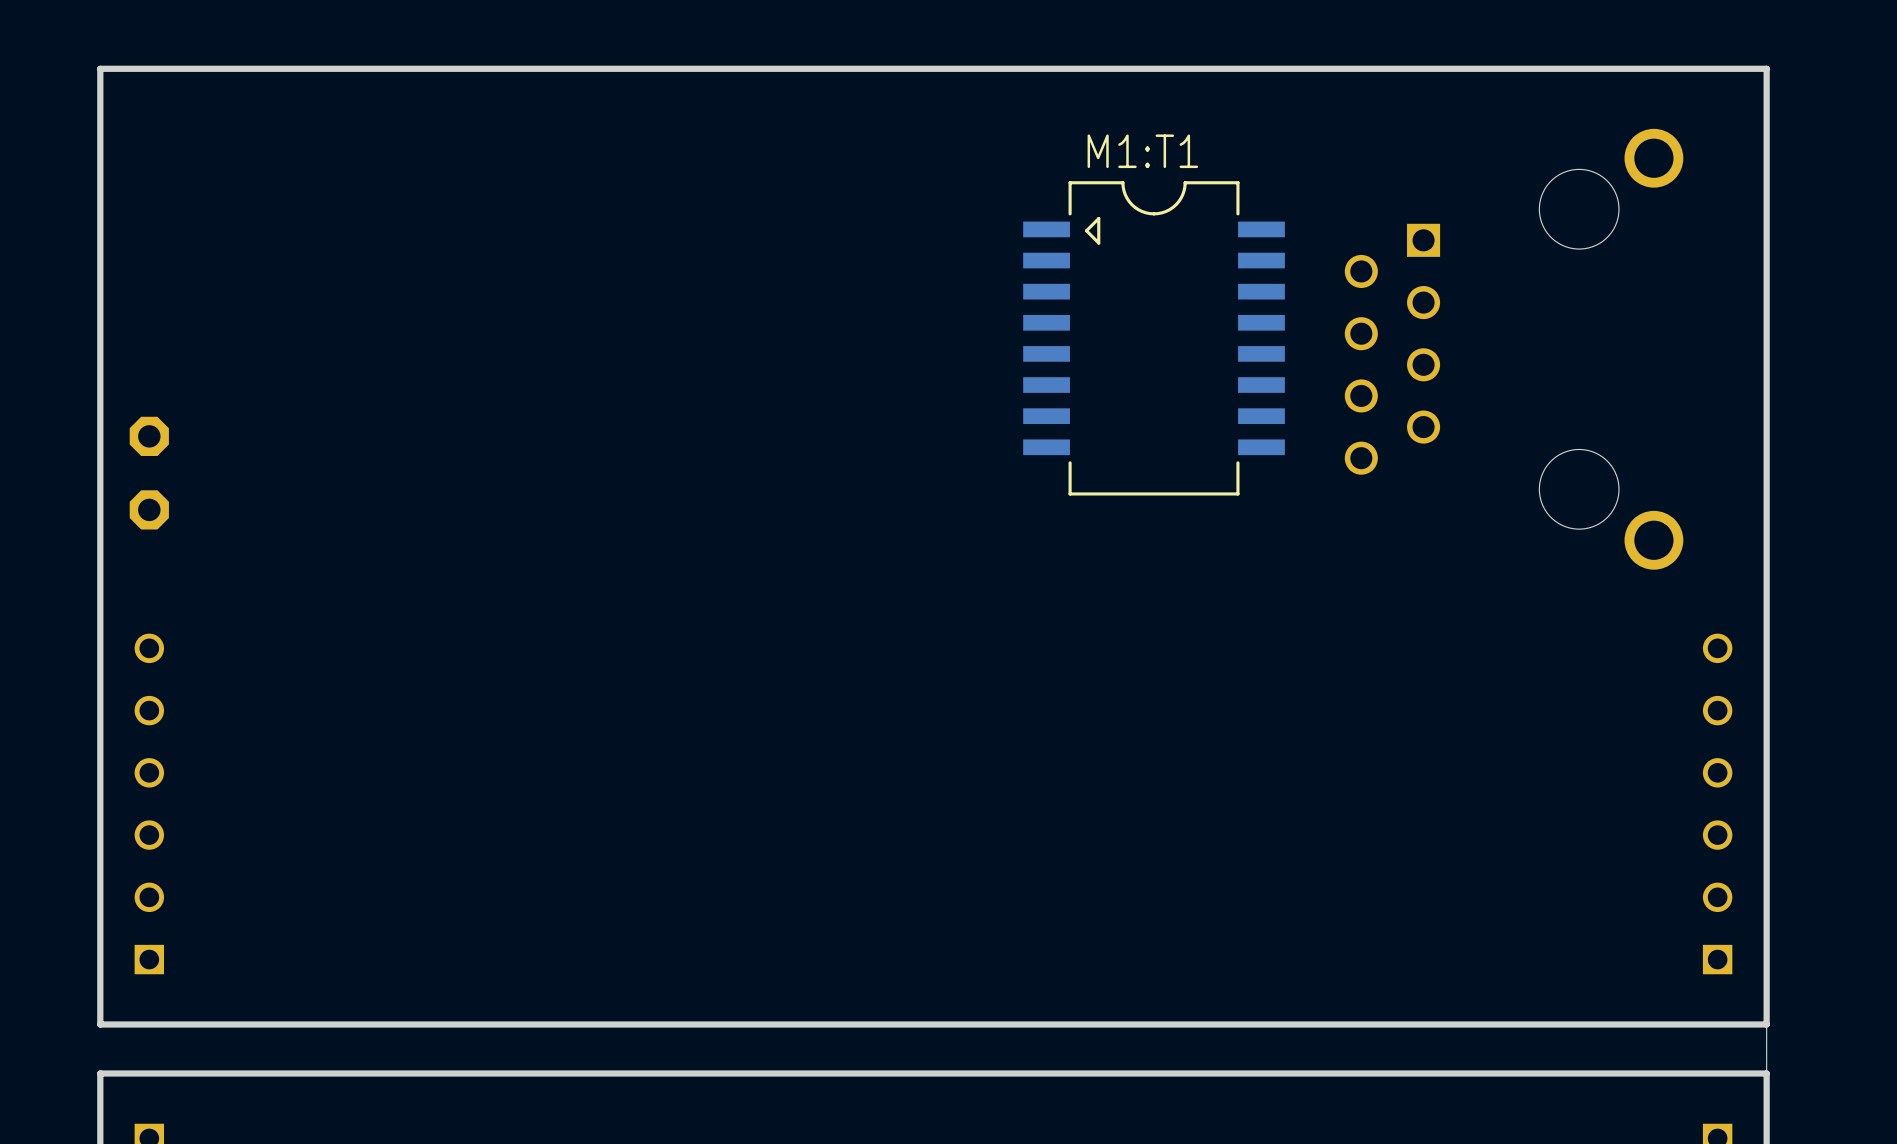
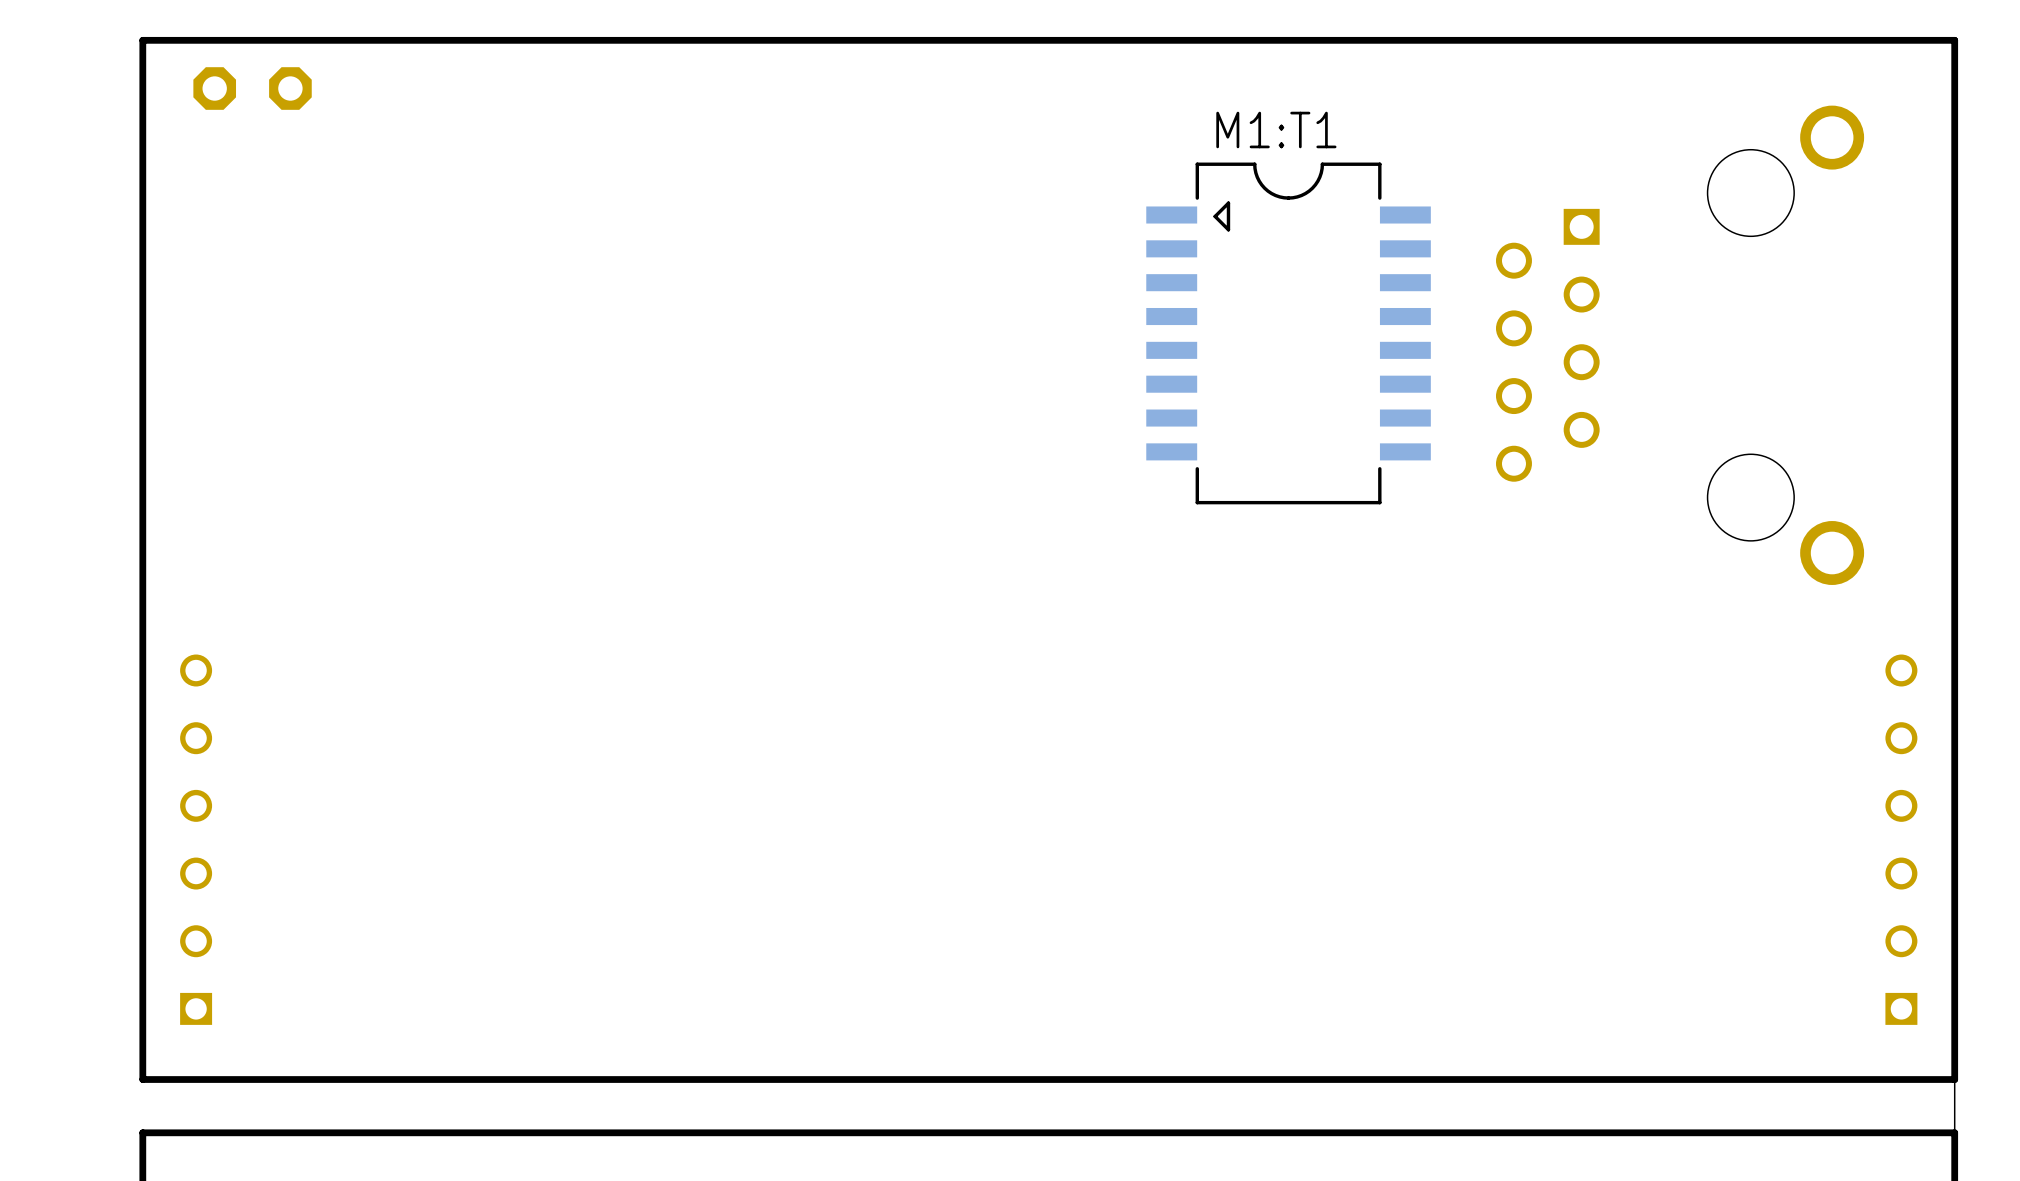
part: none -> (214, 88)
part: none -> (290, 88)
part: (149, 436) -> none
part: (149, 509) -> none

